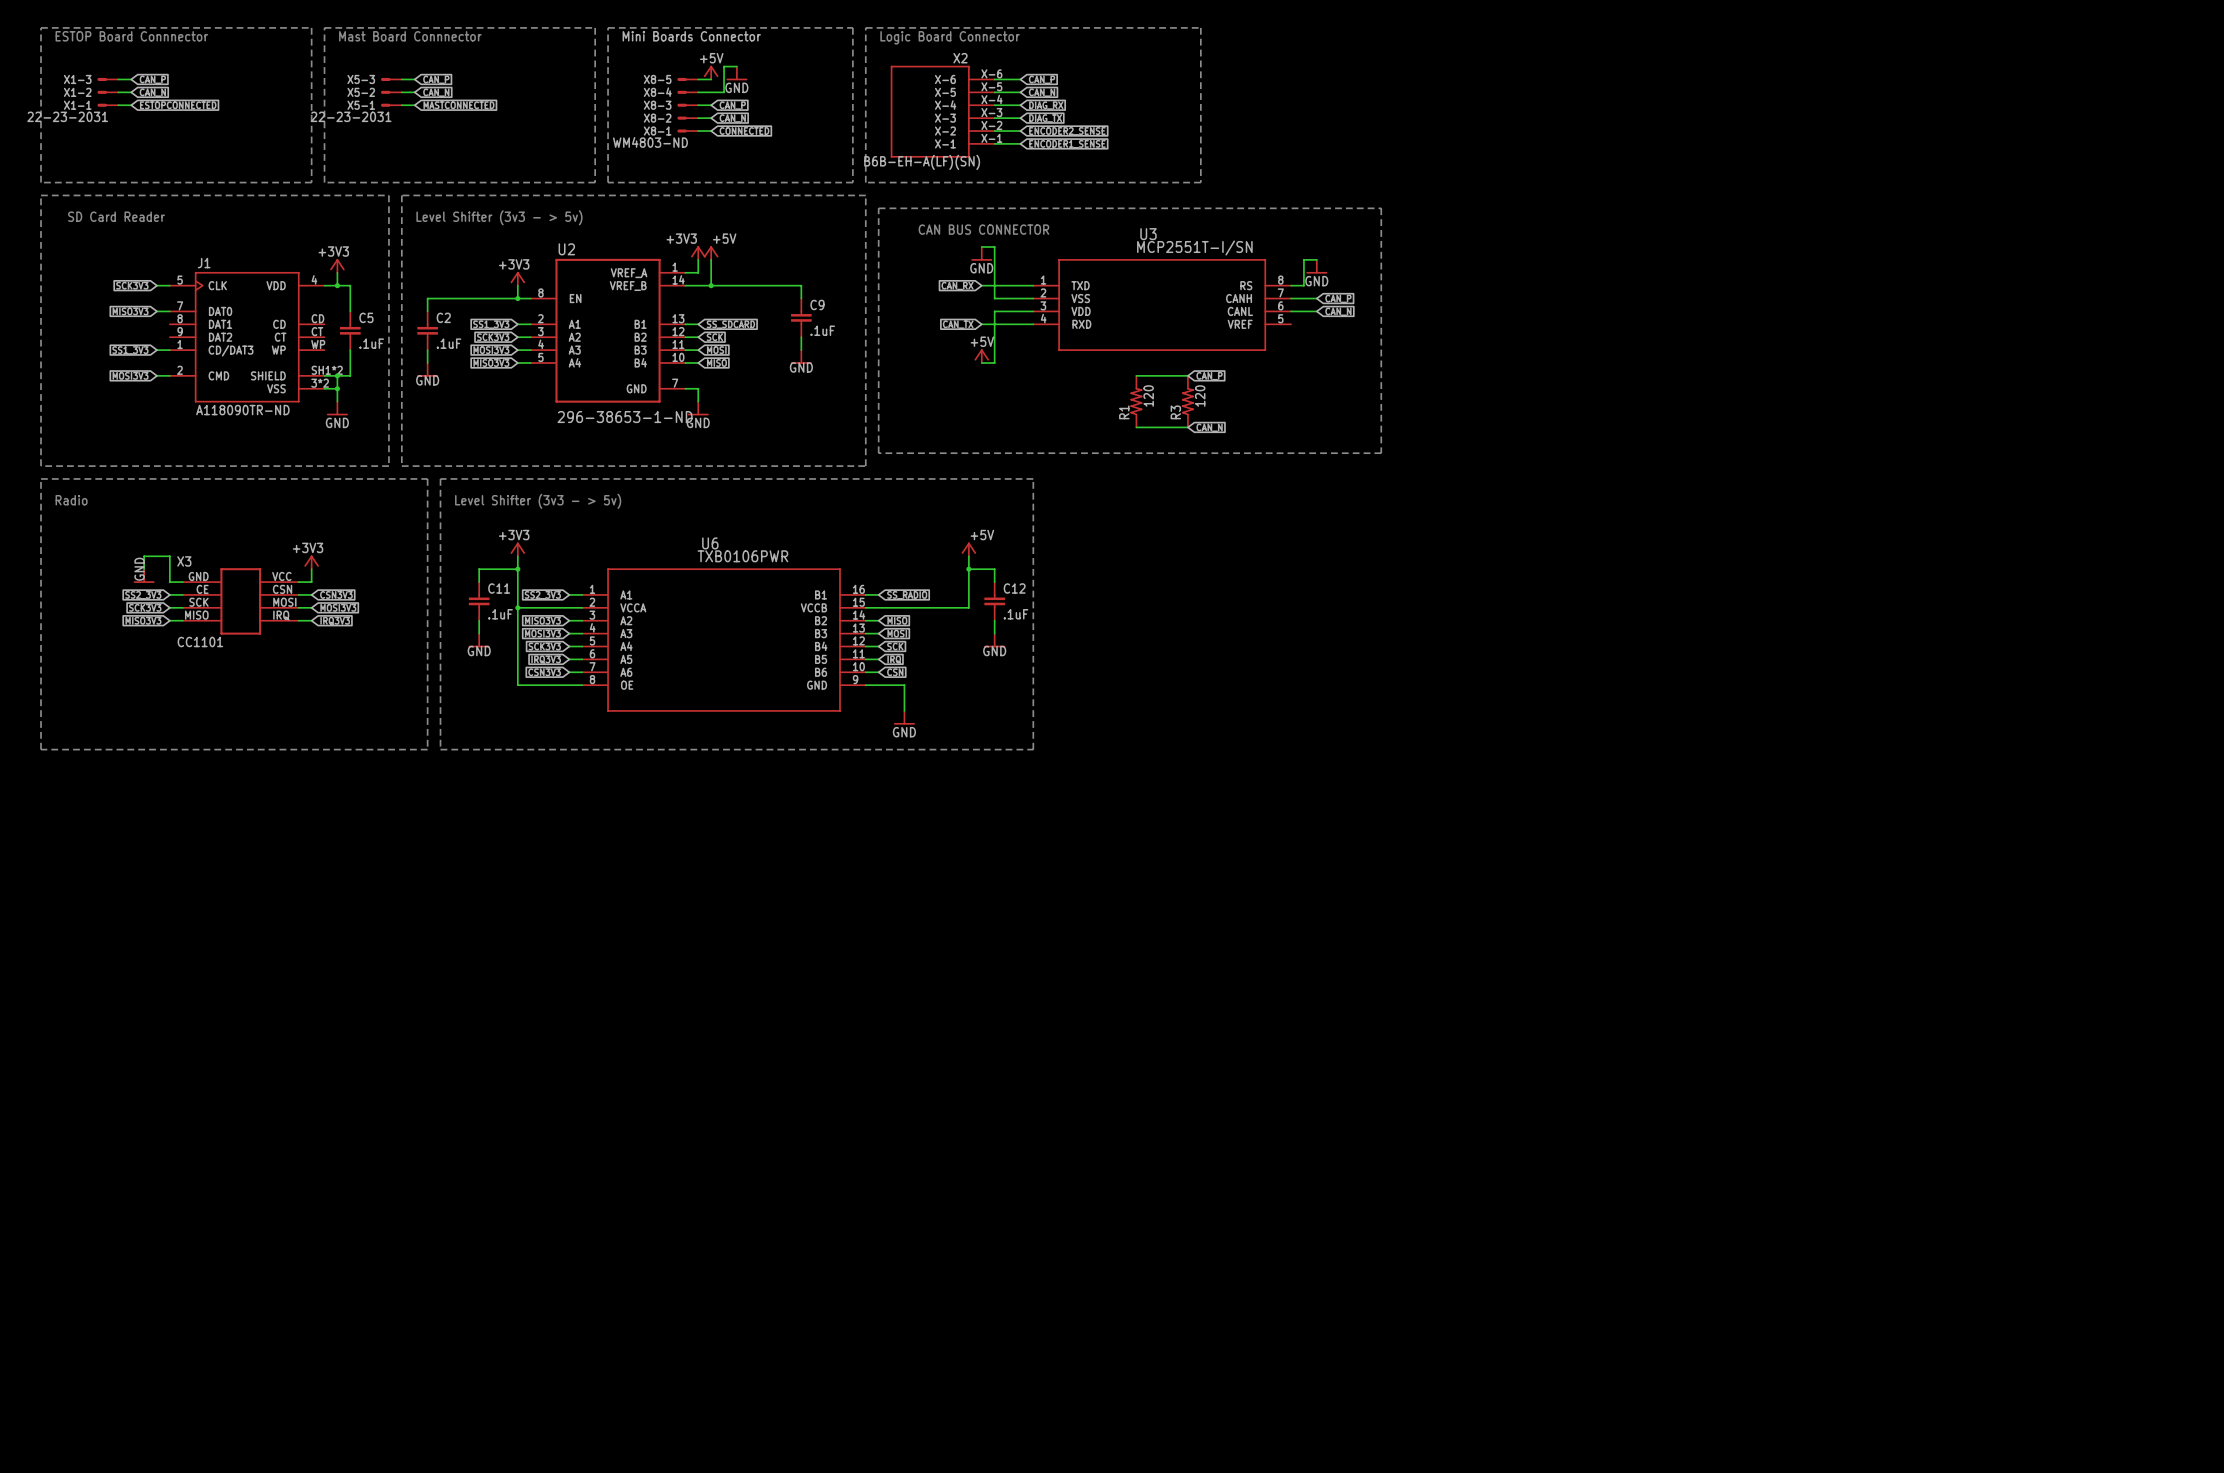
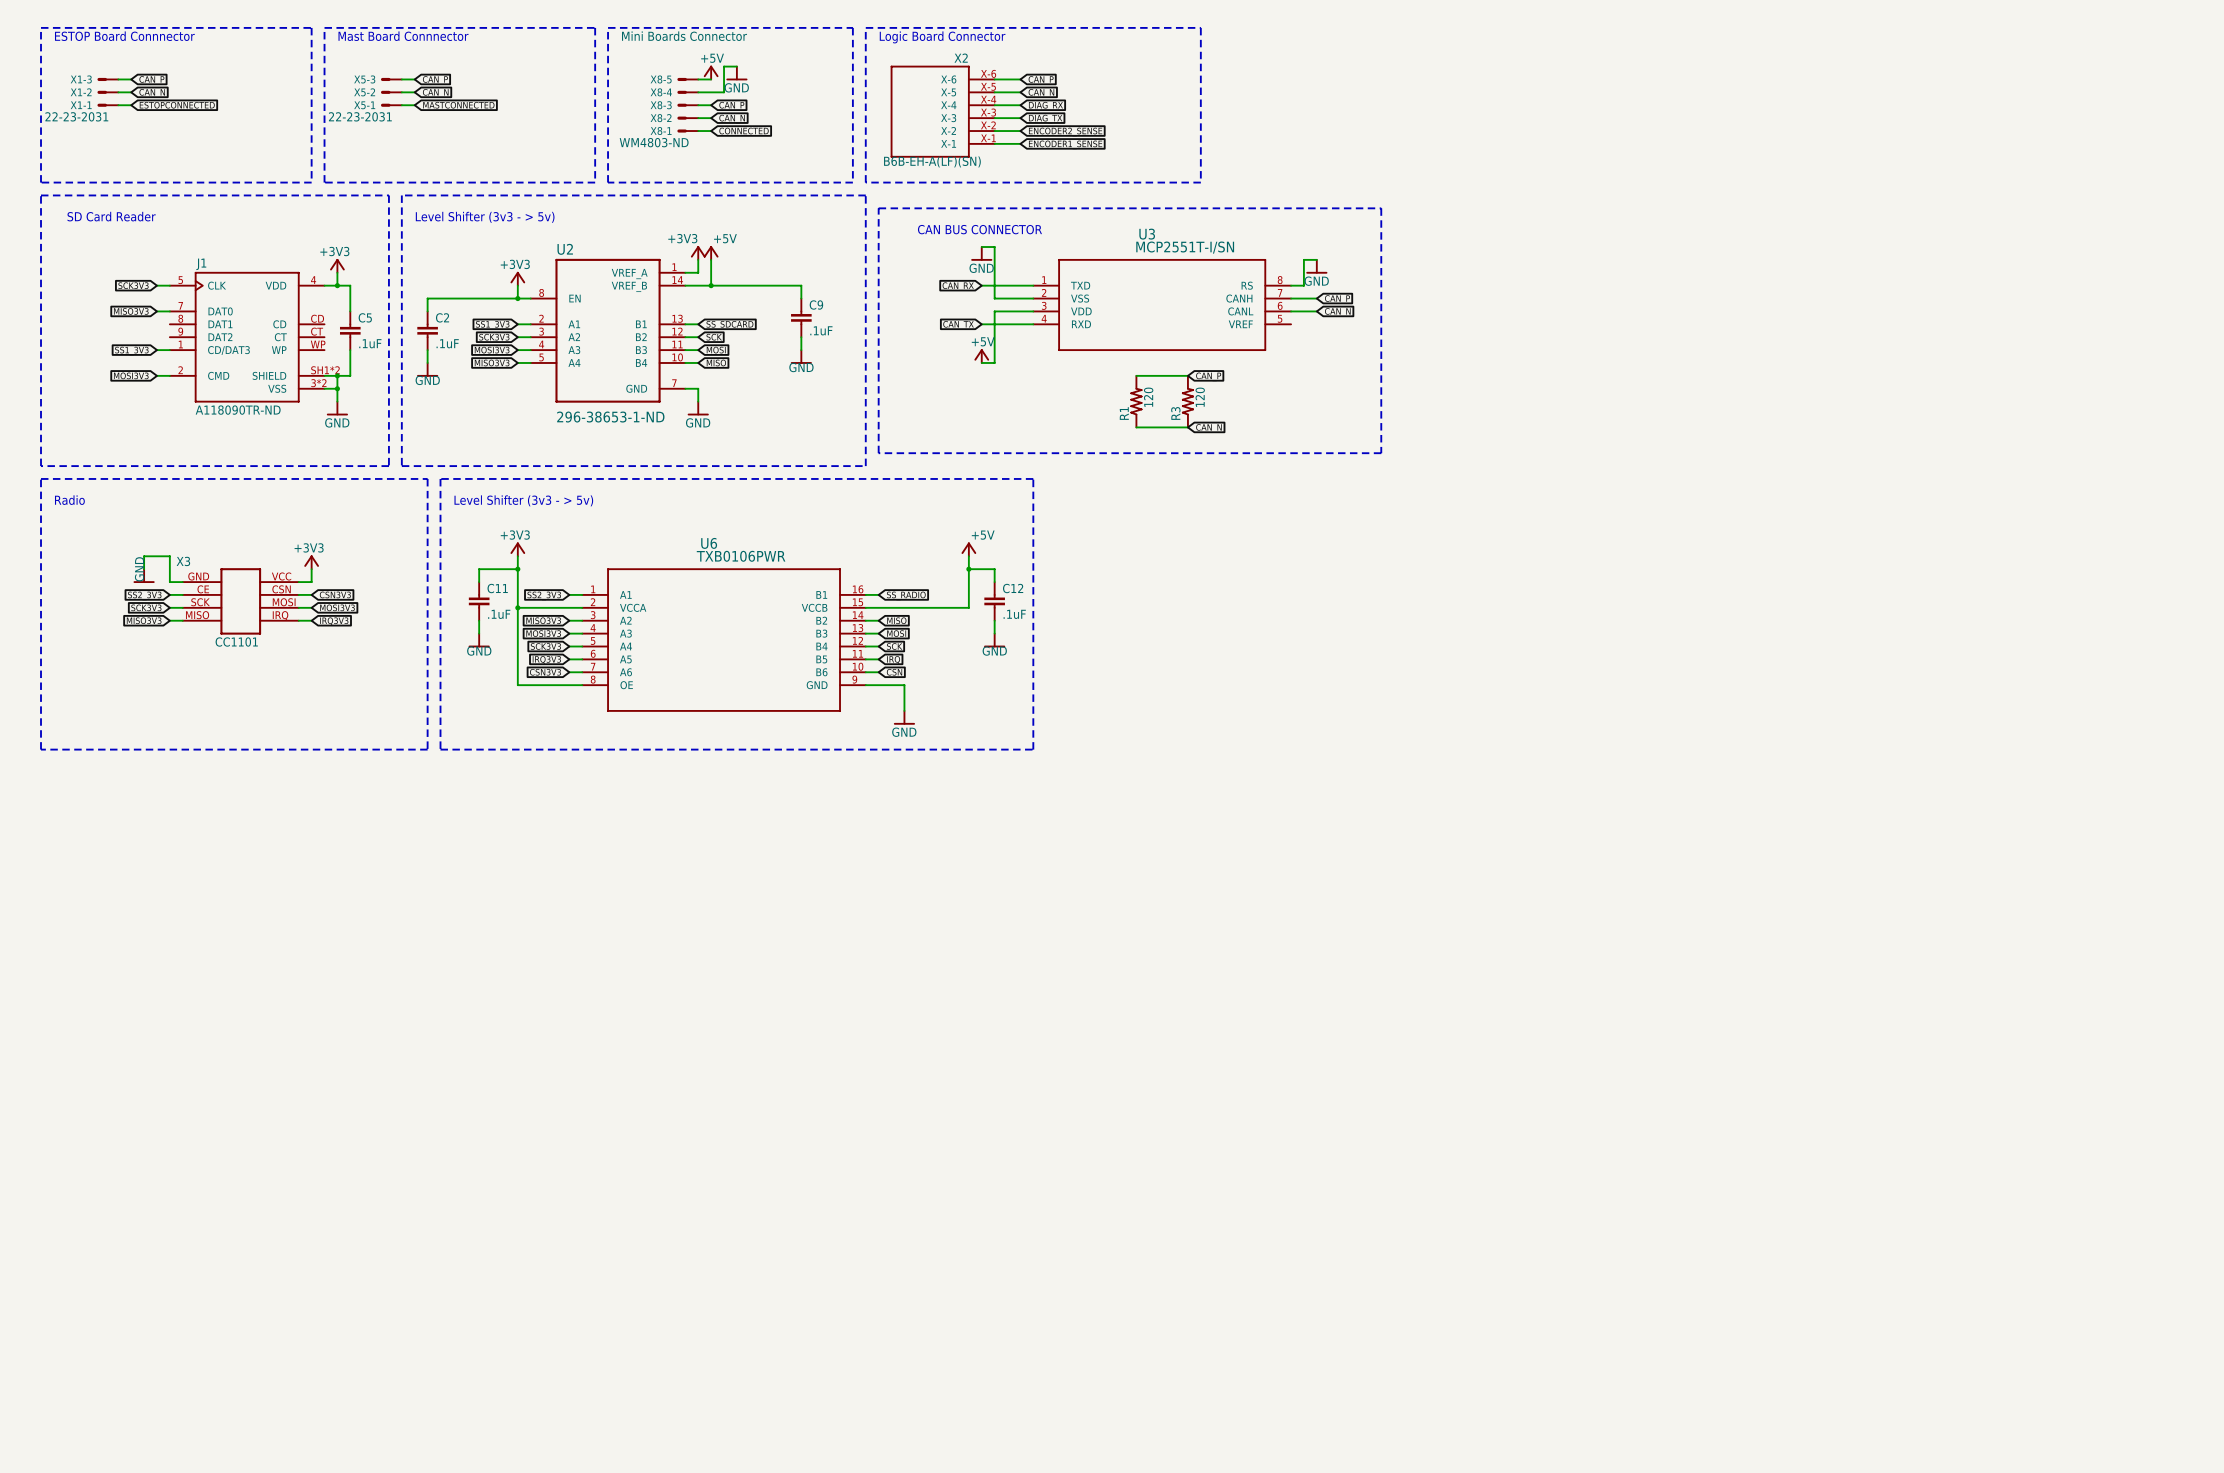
X3 value position: CC1101 (200, 641) -> CC1101 (236, 642)

